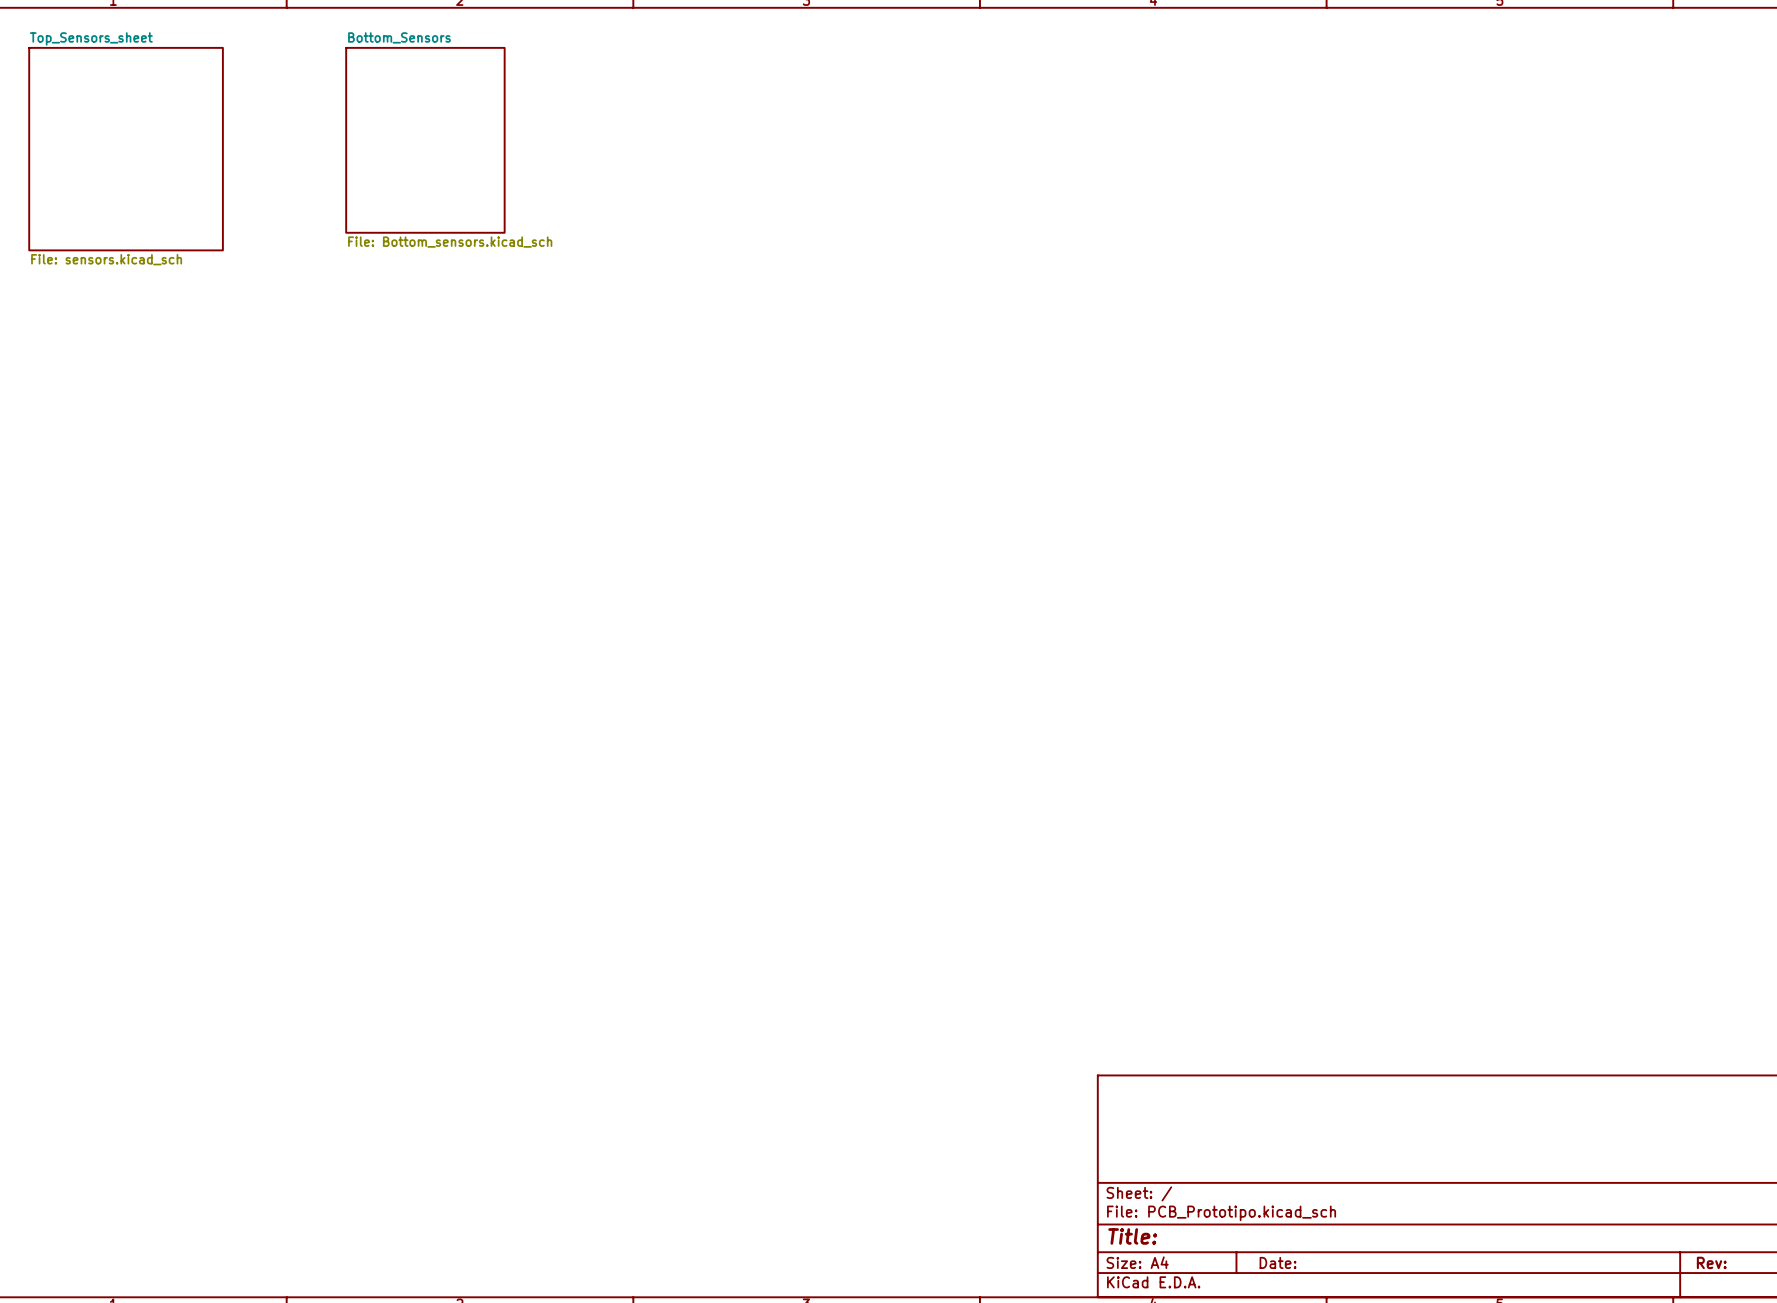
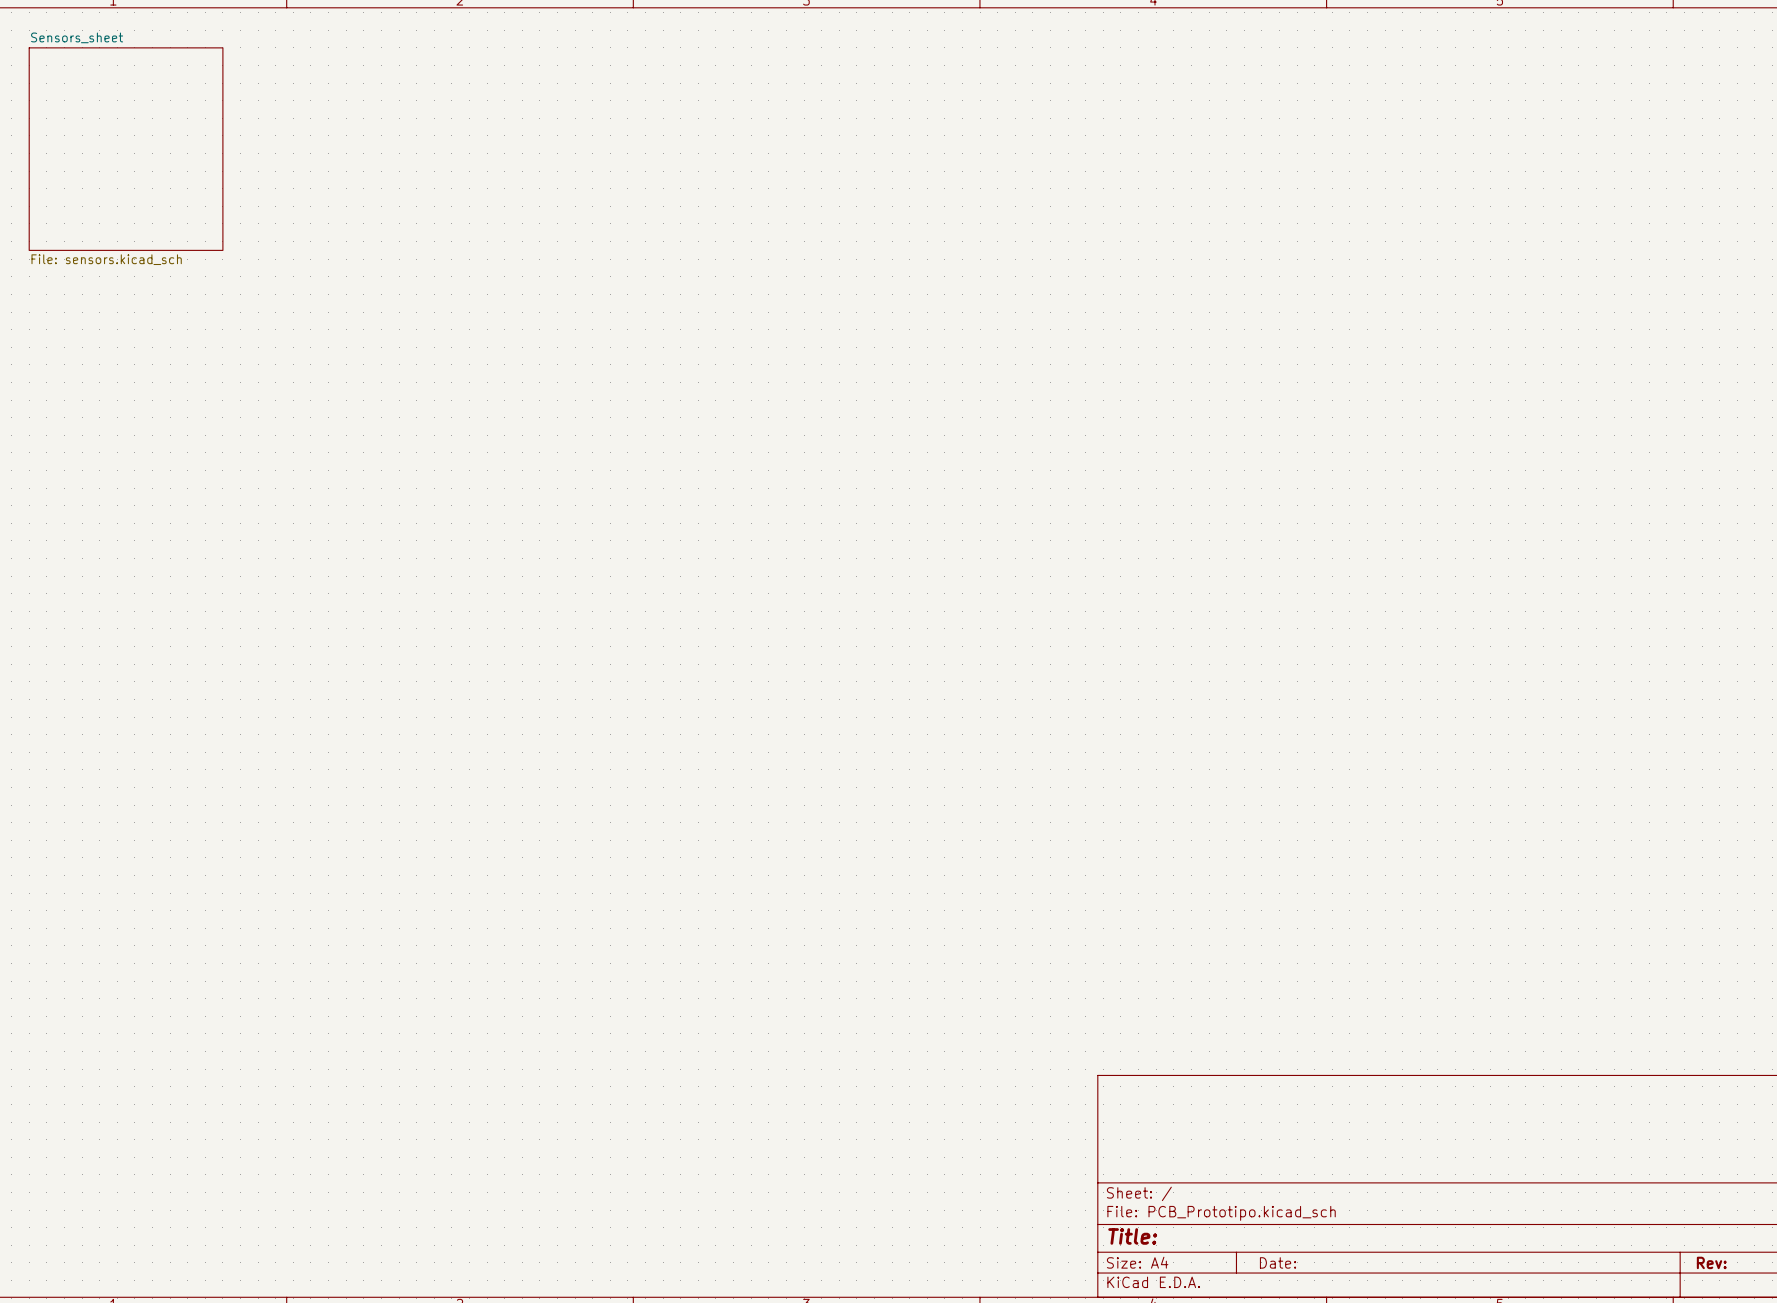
sheet Top_Sensors_sheet name: Top_Sensors_sheet (91, 38) -> Sensors_sheet (77, 37)
sheet Bottom_Sensors: File: Bottom_sensors.kicad_sch (425, 140) -> none

